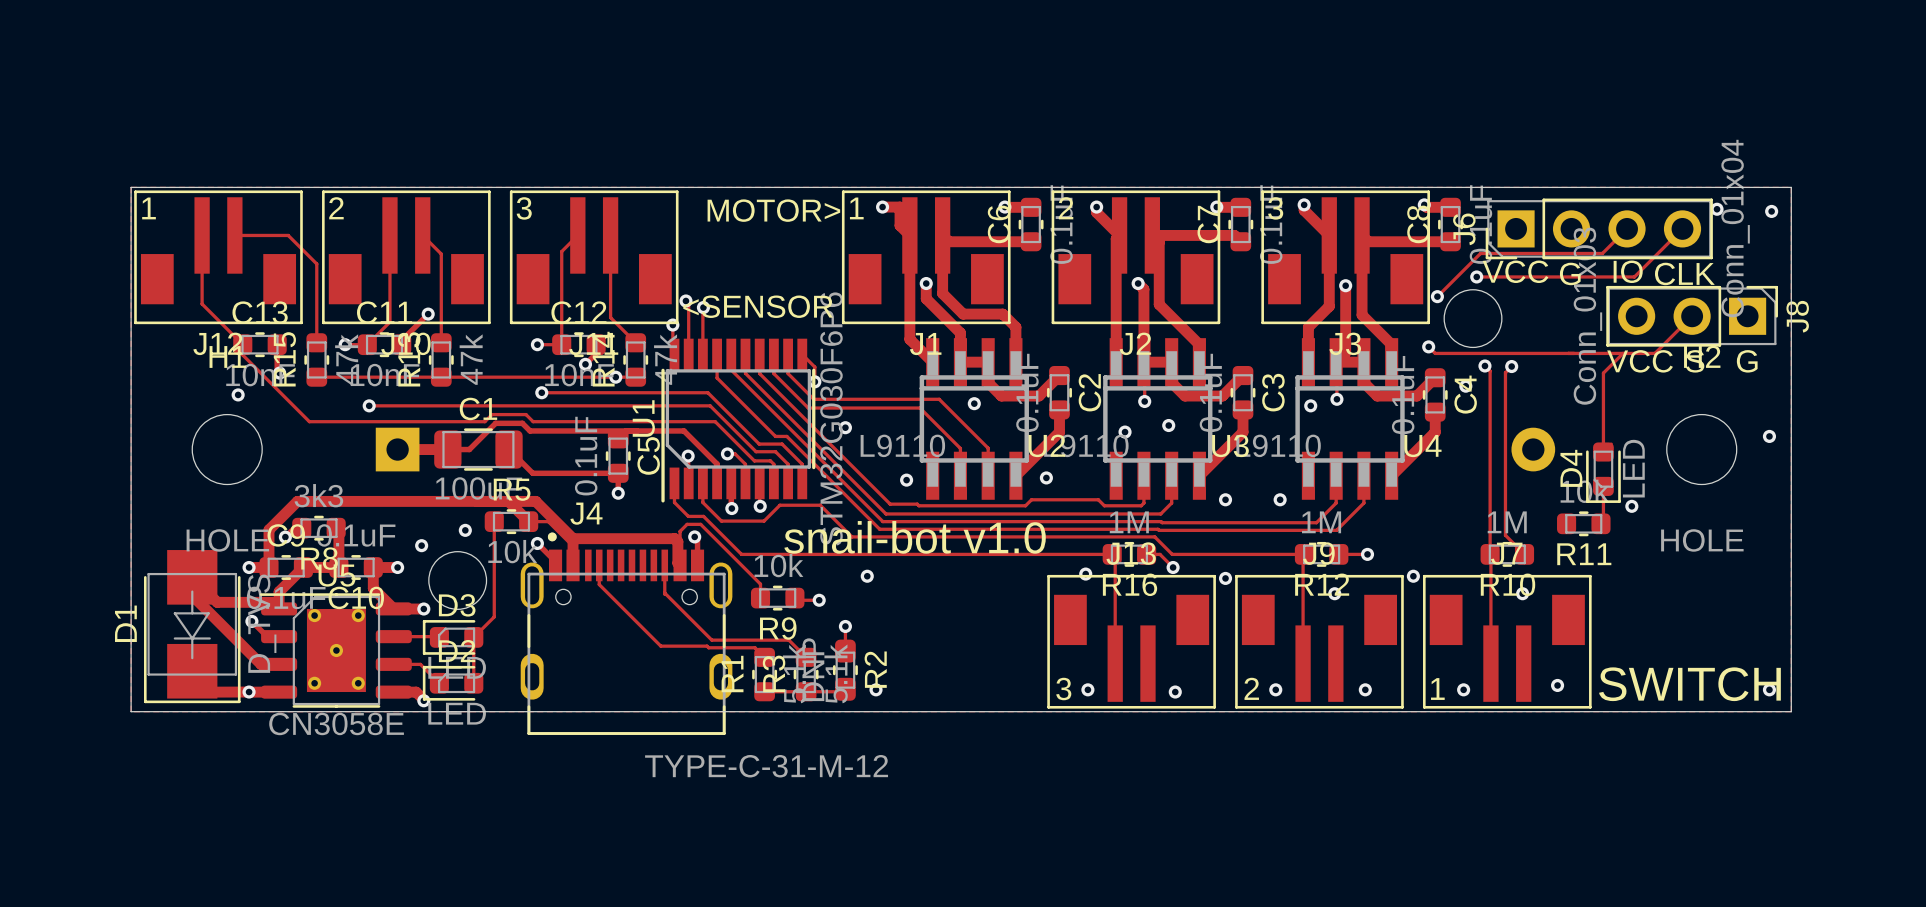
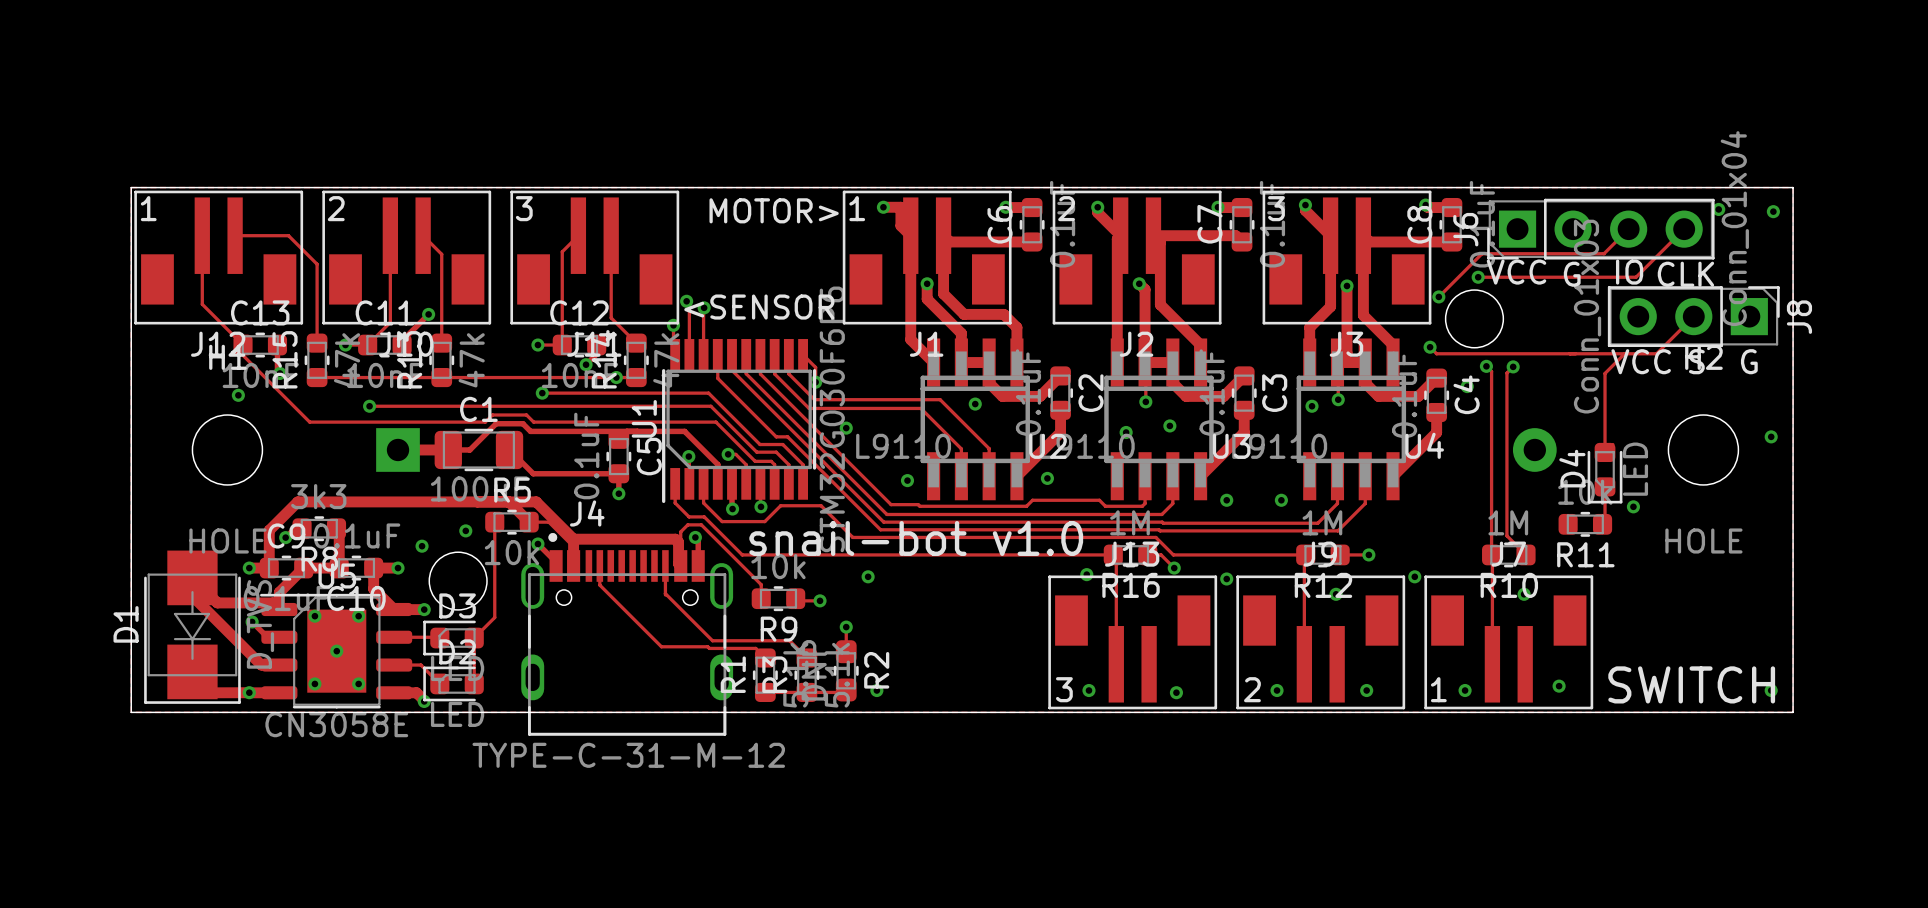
J4 value position: TYPE-C-31-M-12 (766, 766) -> TYPE-C-31-M-12 (628, 755)

